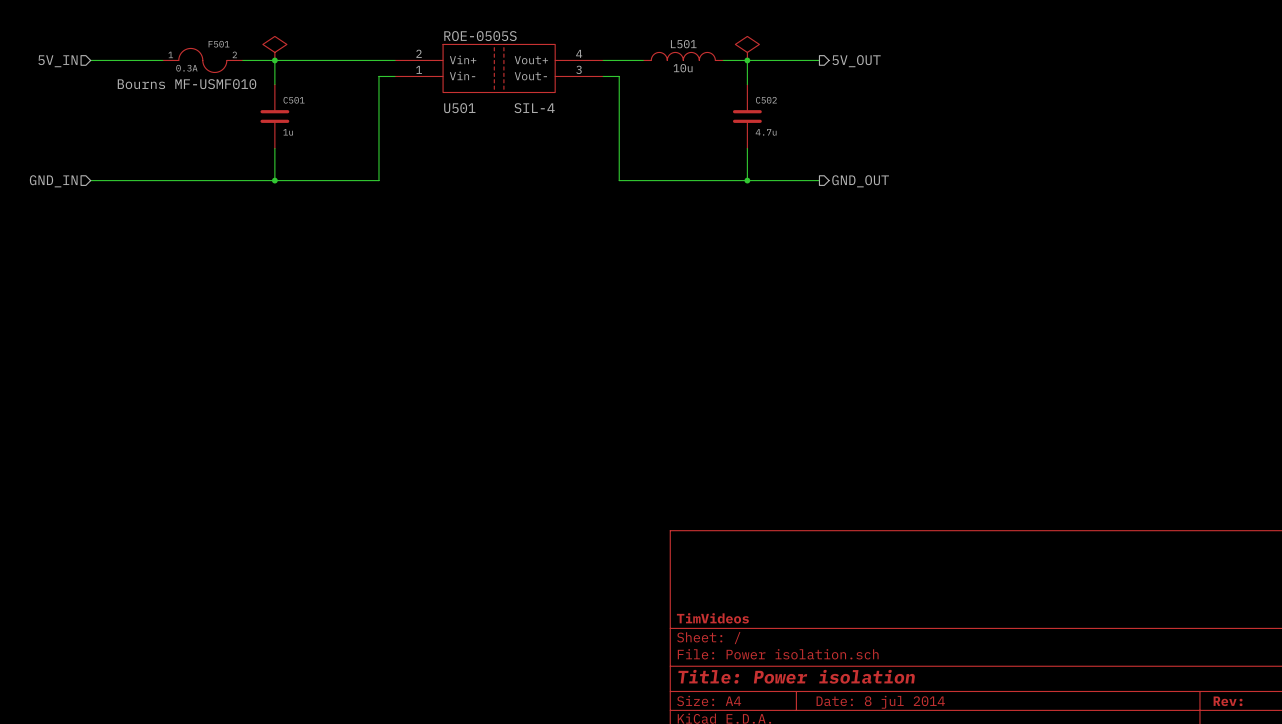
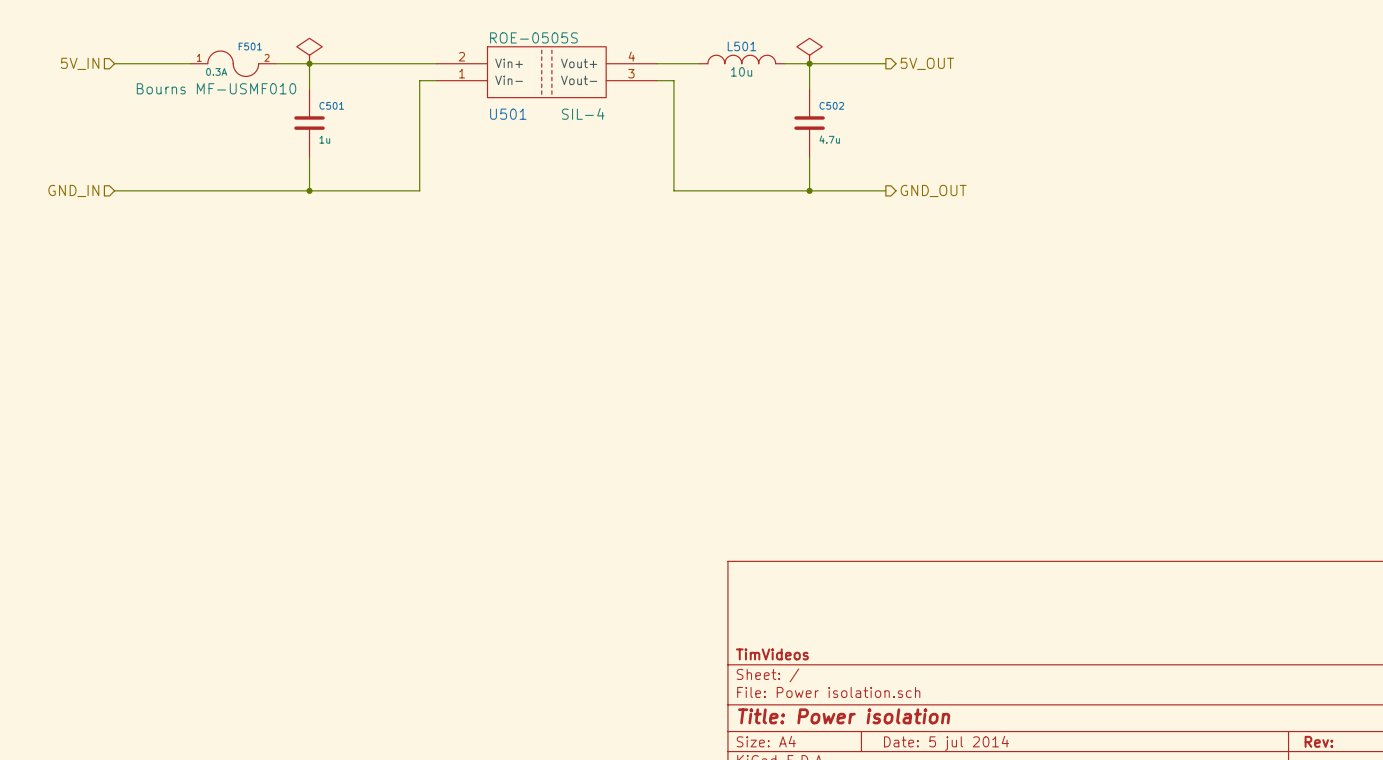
title block: Date: 8 jul 2014 (880, 702) -> Date: 5 jul 2014 (946, 743)

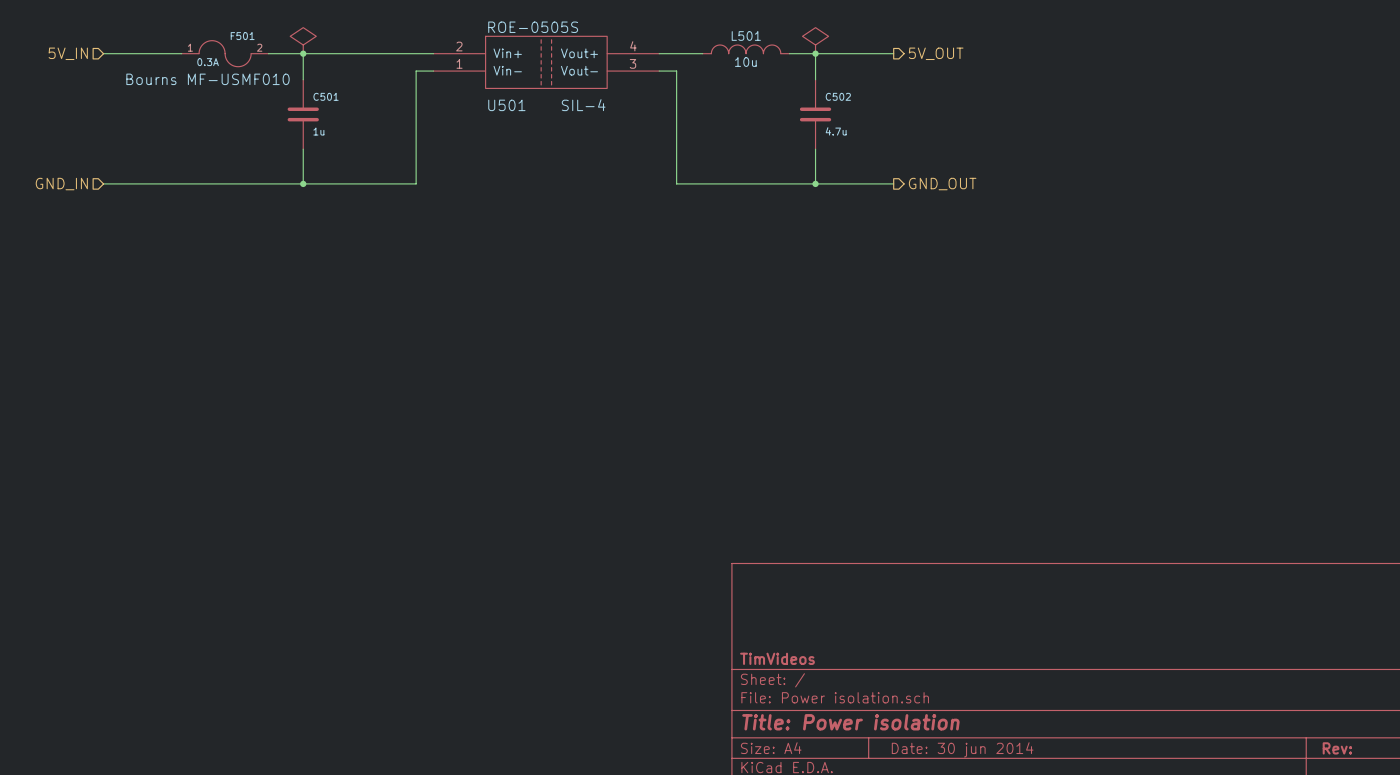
title block: Date: 5 jul 2014 (946, 743) -> Date: 30 jun 2014 (962, 749)

